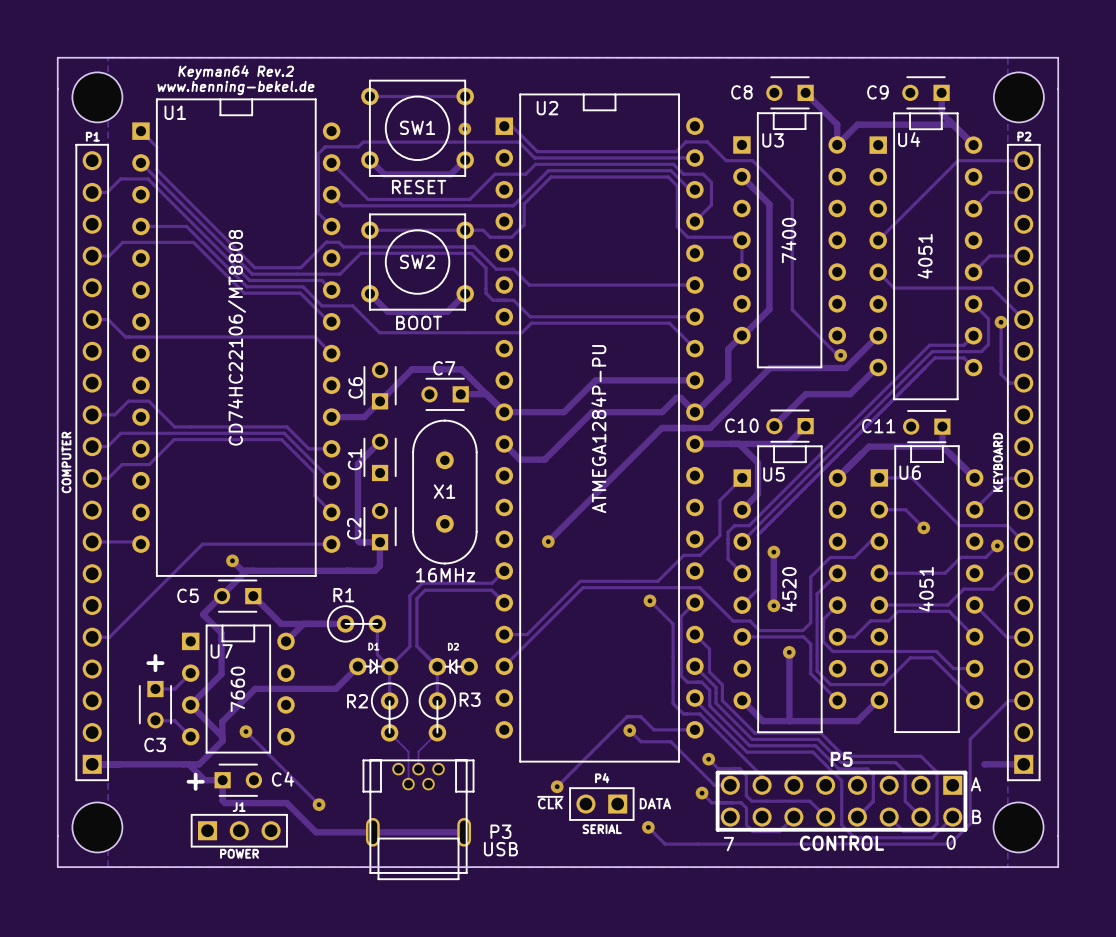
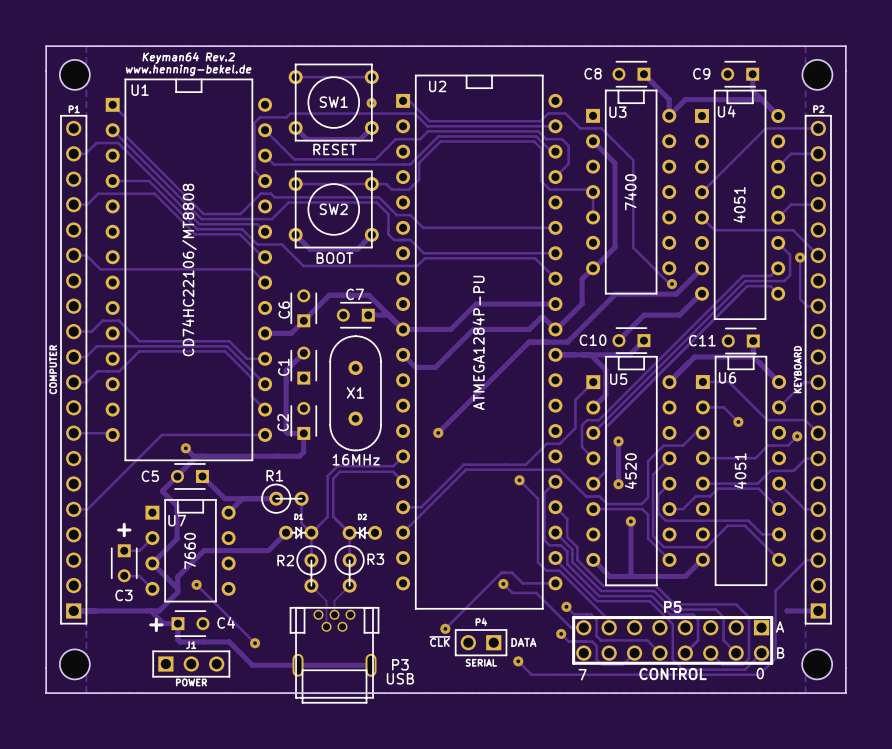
part footprint: [72, 72, 123, 123] -> [59, 59, 90, 90]
part footprint: [993, 72, 1044, 123] -> [802, 59, 833, 90]
part footprint: [72, 802, 123, 853] -> [59, 649, 90, 680]
part footprint: [993, 802, 1044, 853] -> [802, 649, 833, 680]

